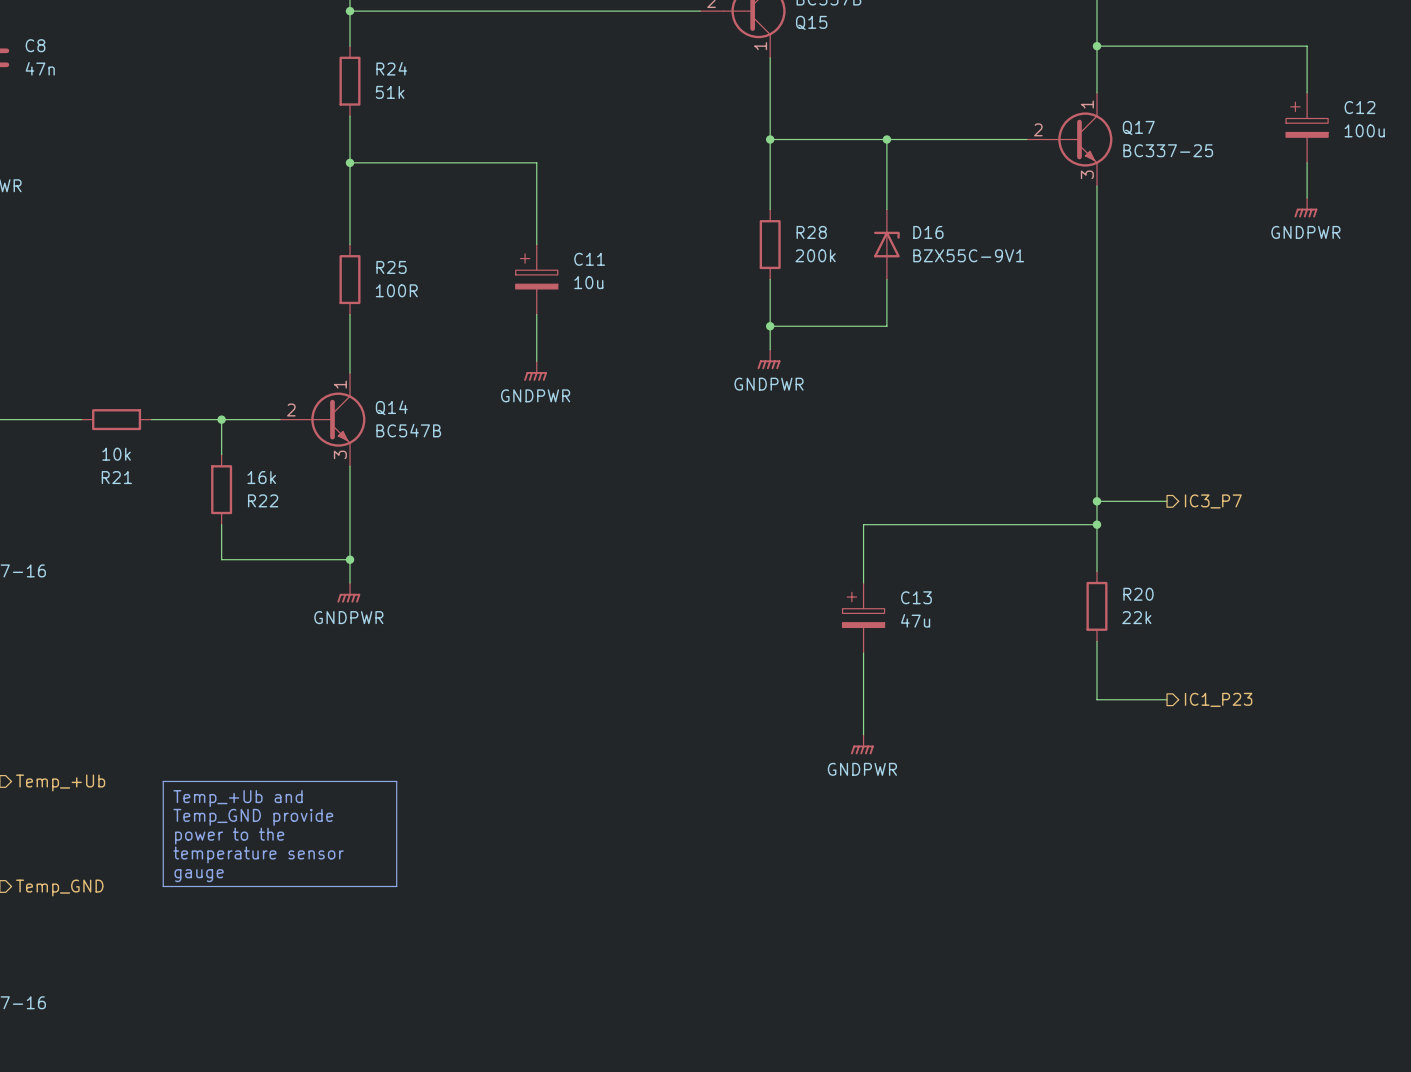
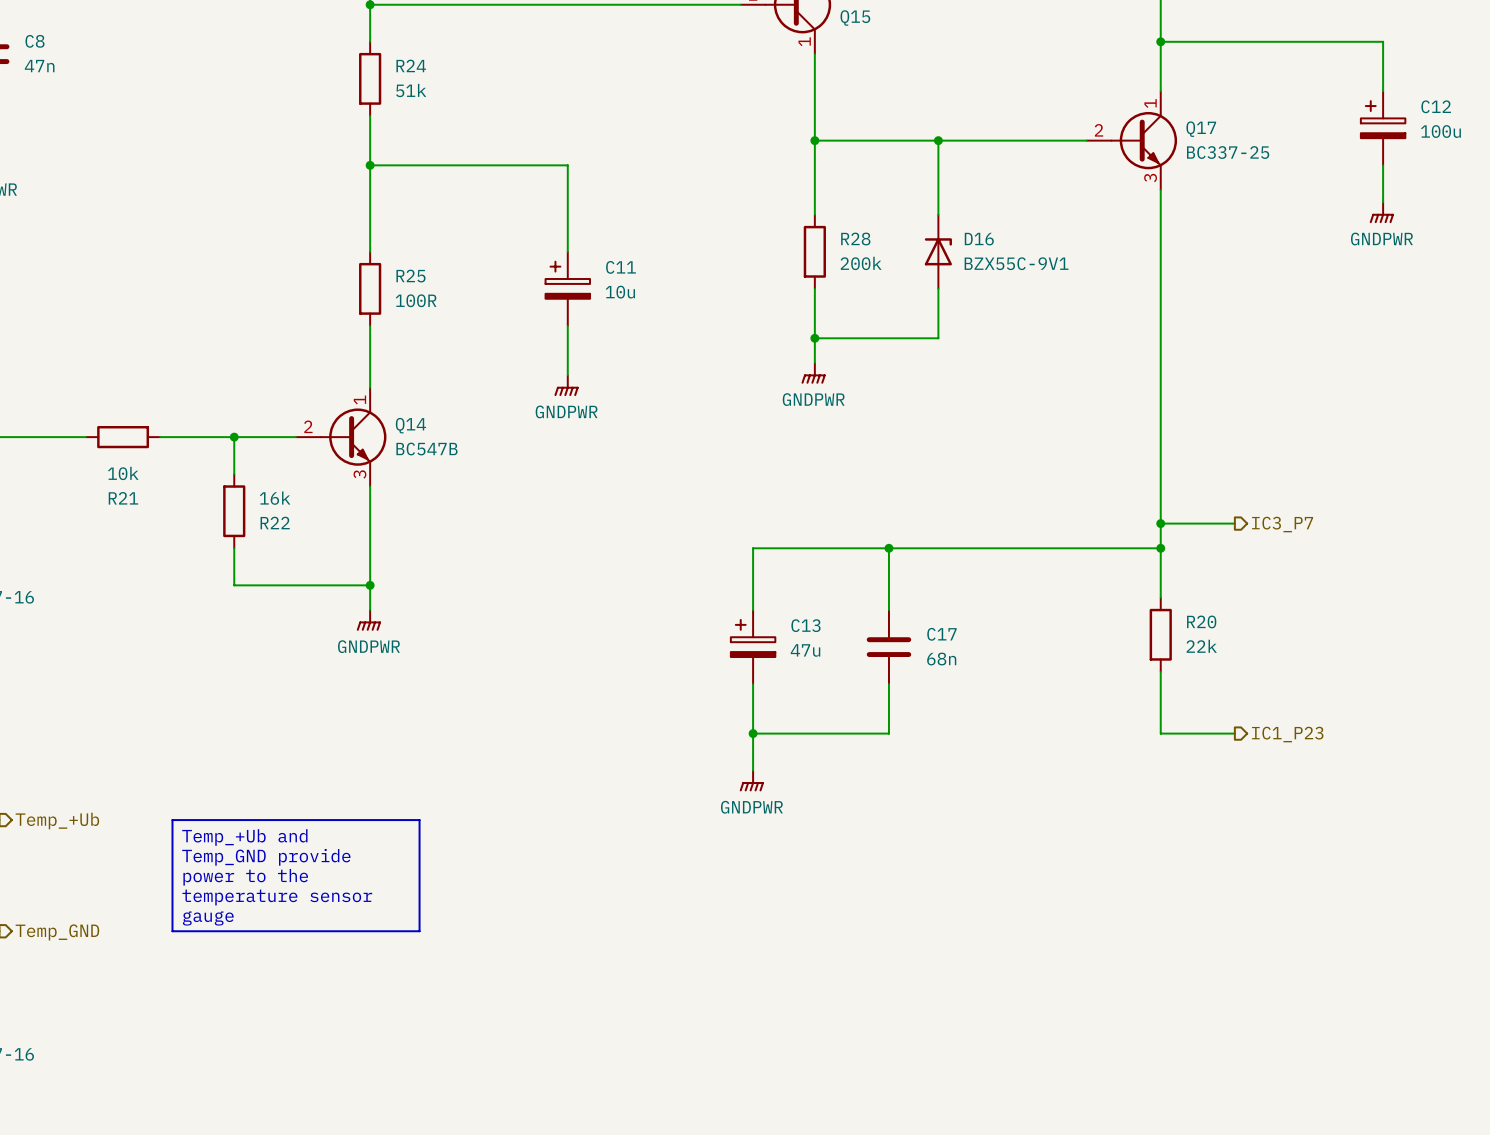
wire: none -> (888, 548) (888, 610)
junction: none -> (888, 548)
wire: (863, 524) (863, 583) -> (913, 548) (753, 548) (753, 610)
C17: none -> 68n (888, 647)
C13 position: (863, 618) -> (753, 647)
wire: none -> (888, 684) (888, 733) (753, 733)
wire: (863, 653) (863, 734) -> (753, 684) (753, 770)
junction: none -> (753, 733)
power symbol position: GNDPWR (862, 744) -> GNDPWR (751, 781)

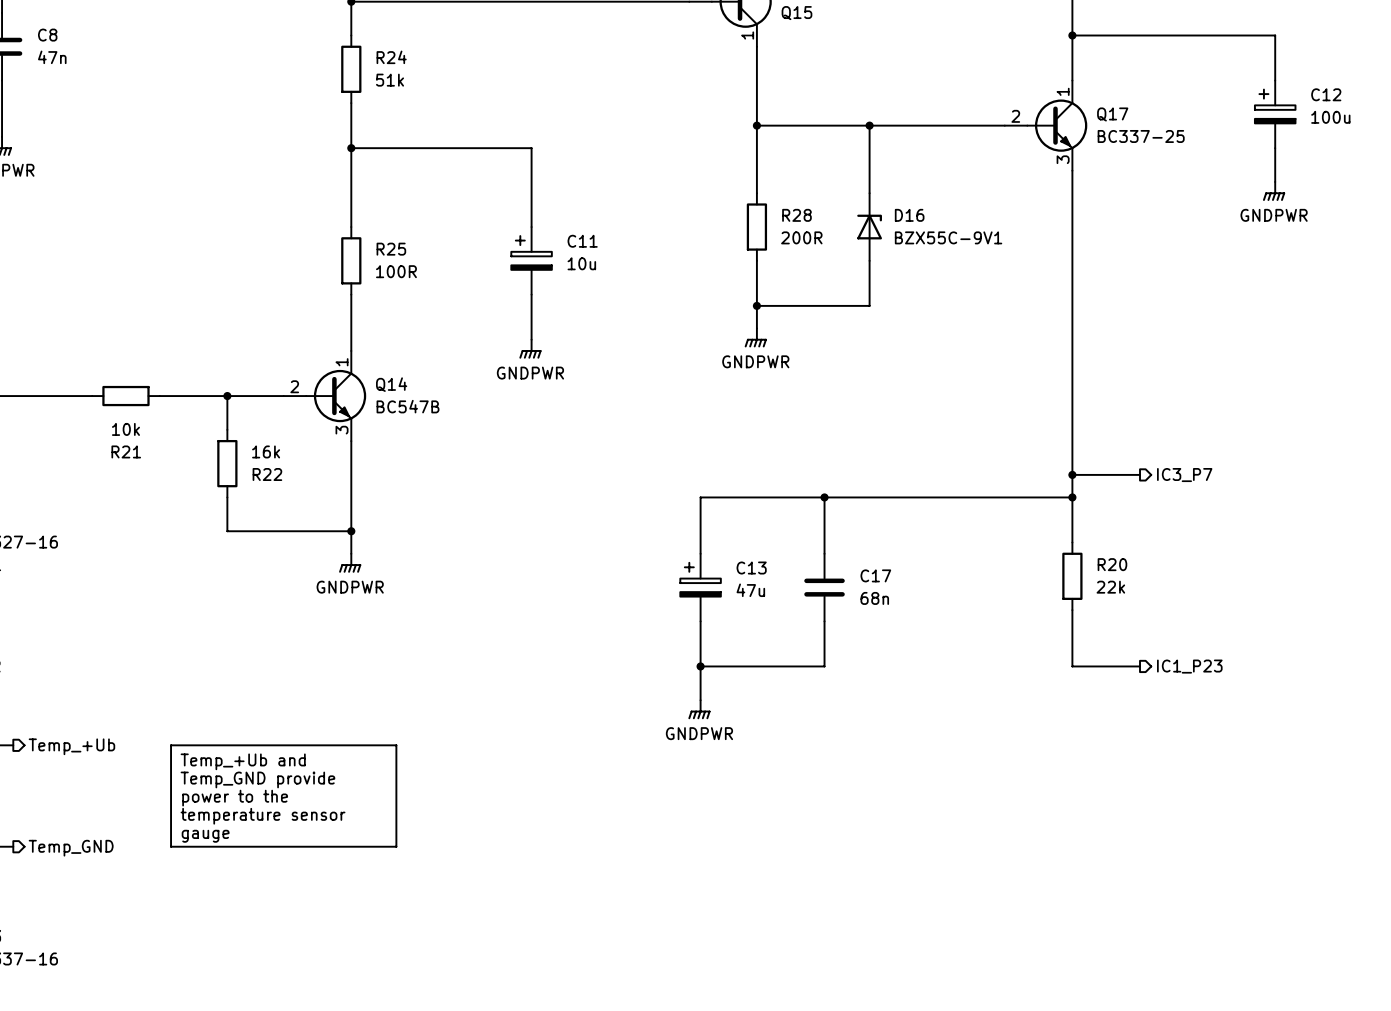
R28 value: 200k (861, 263) -> 200R (801, 237)

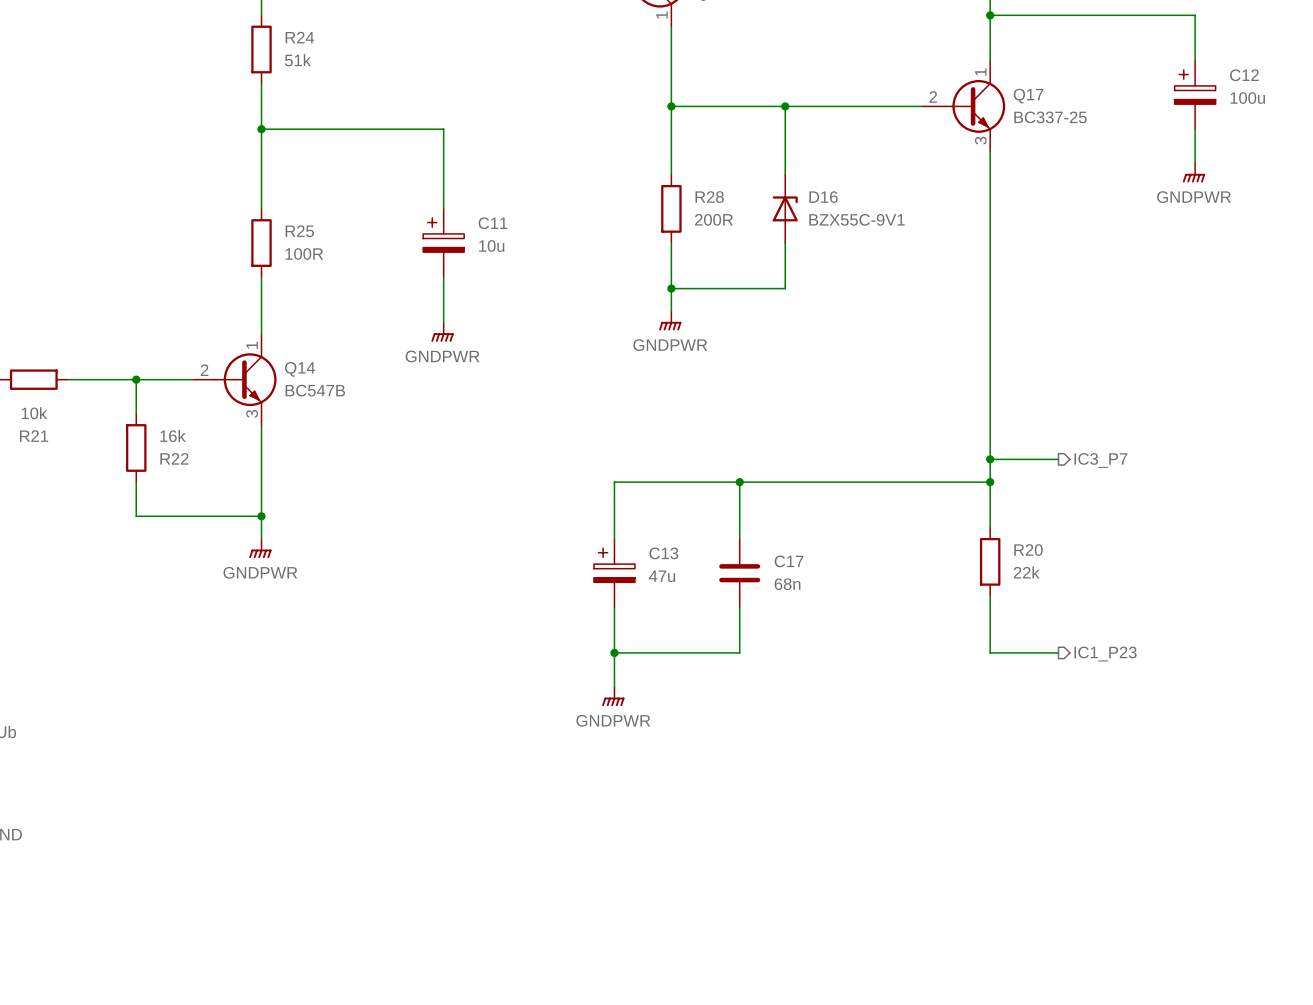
line: (171, 745) (396, 745) (396, 846) (171, 846) (171, 745) -> none
text: Temp_+Ub and (243, 761) -> none
text: Temp_GND provide (257, 779) -> none
text: power to the (235, 798) -> none
text: temperature sensor (263, 816) -> none
text: gauge (205, 836) -> none

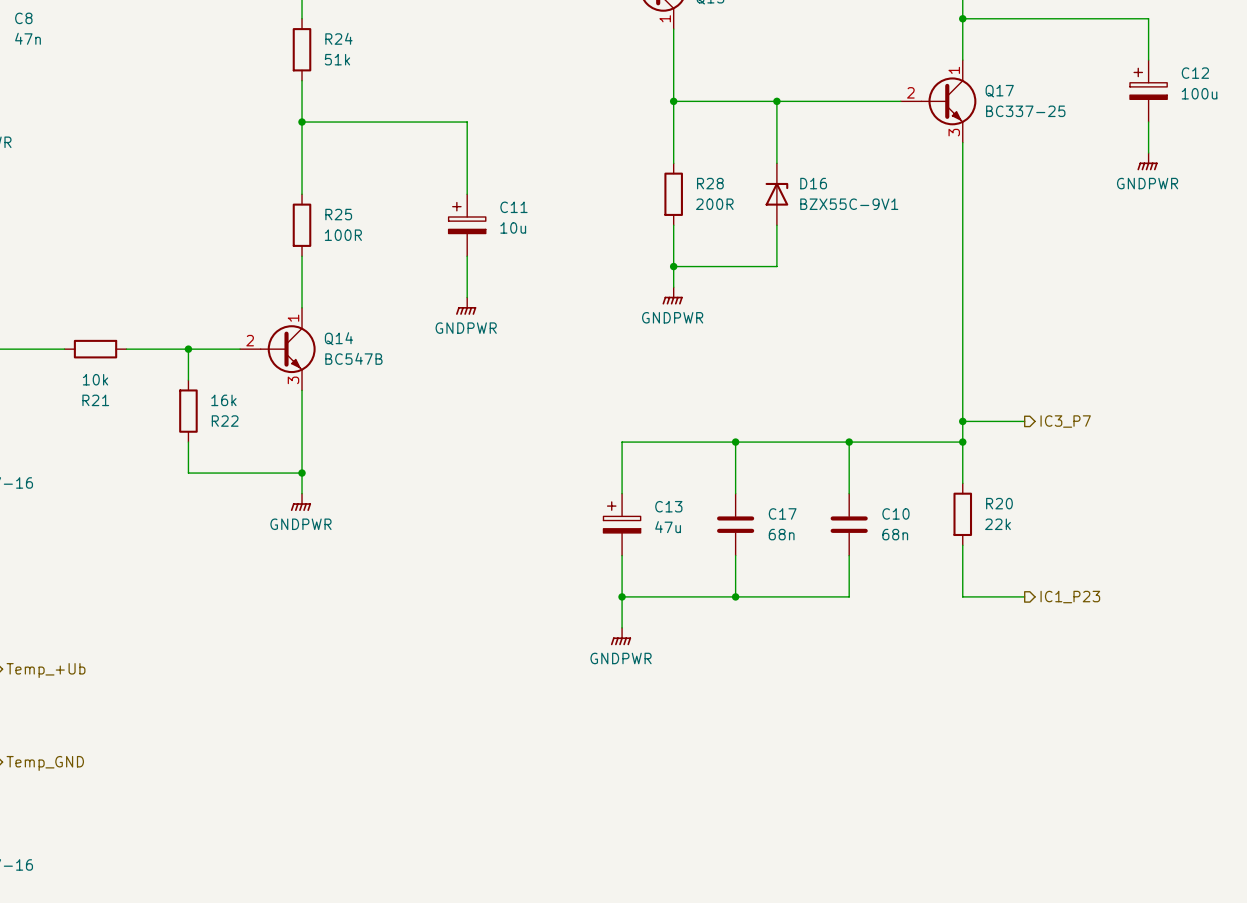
wire: none -> (849, 442) (849, 493)
junction: none -> (849, 442)
C10: none -> 68n (849, 524)
wire: none -> (849, 555) (849, 596) (735, 596)
junction: none -> (735, 596)

